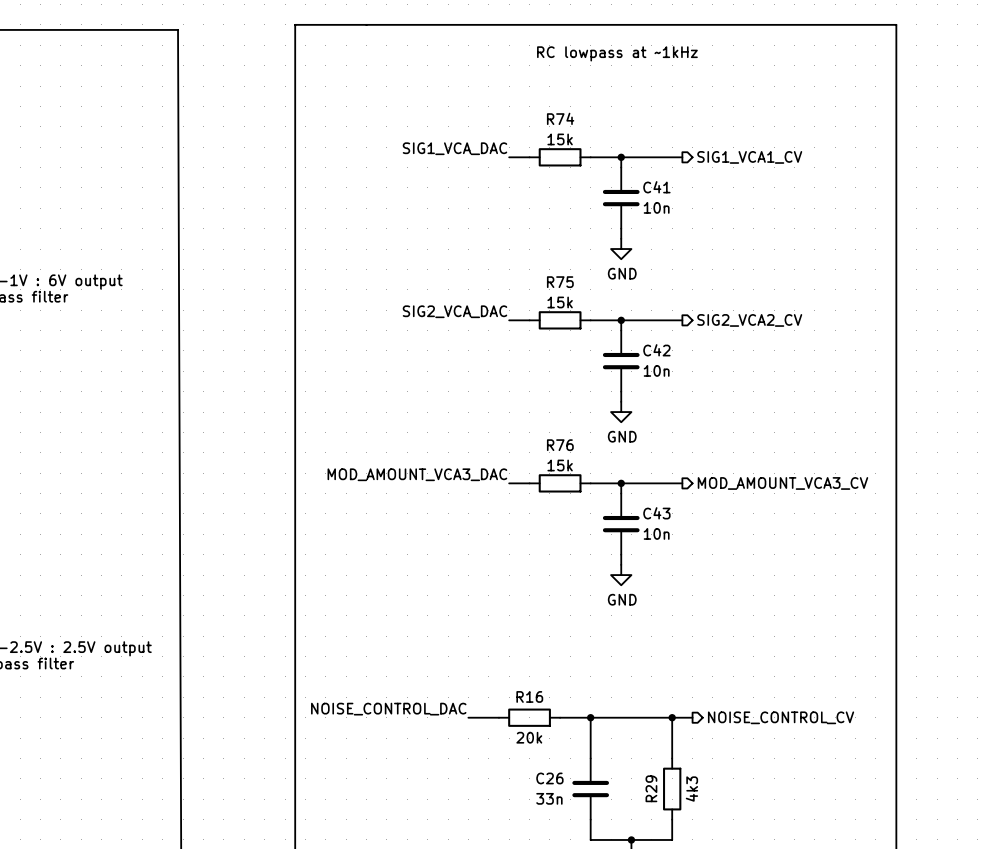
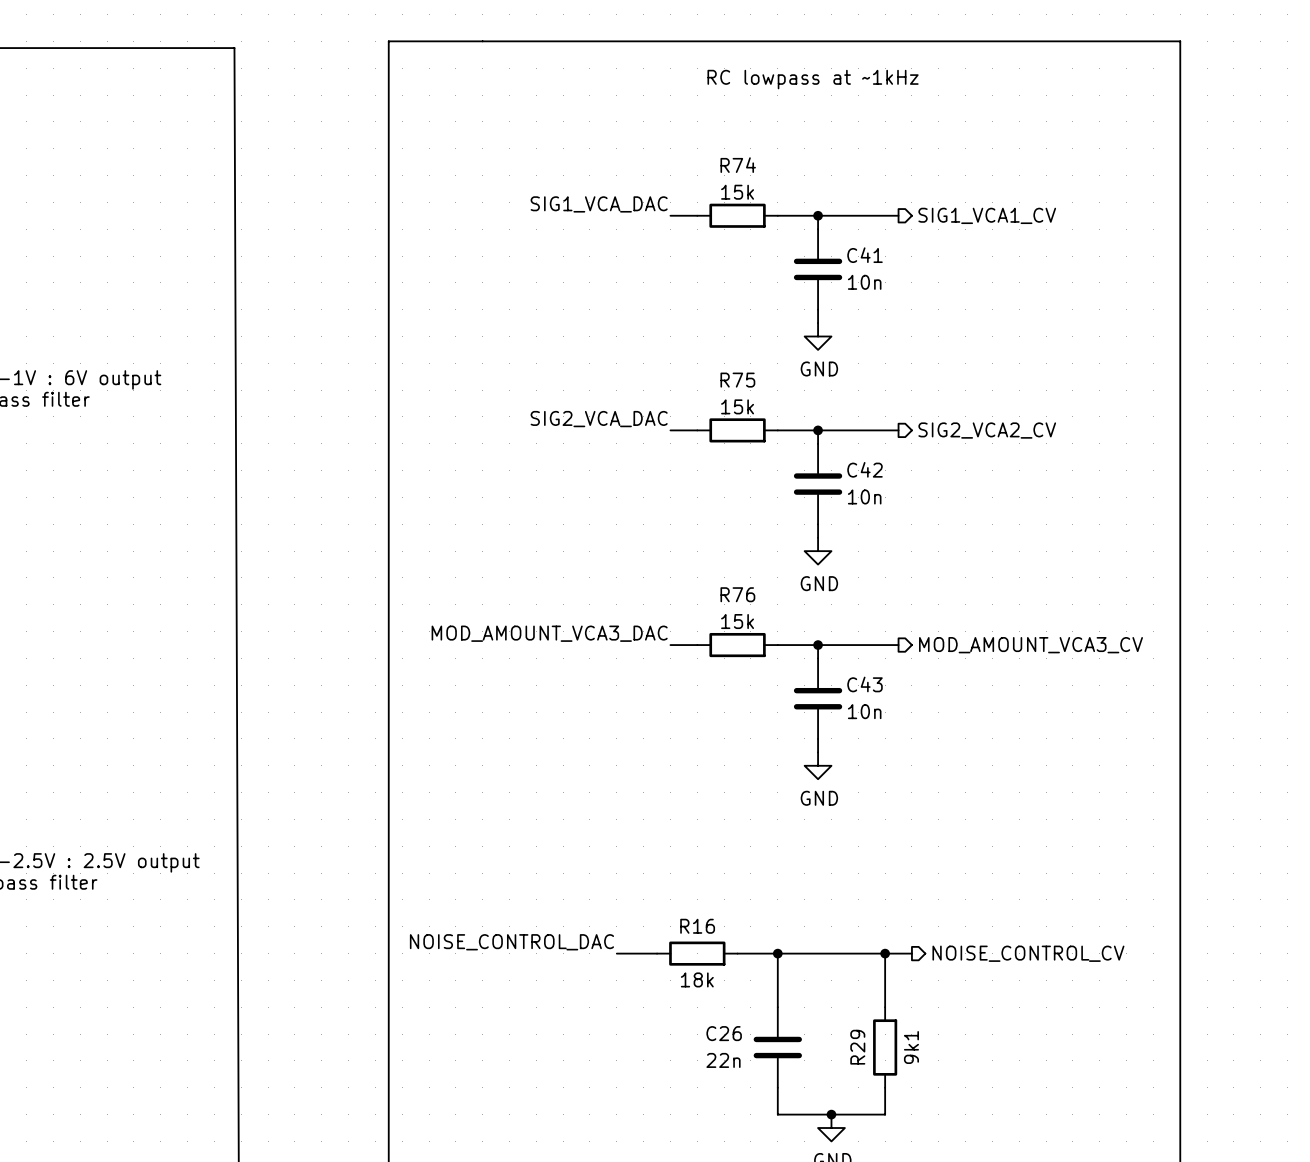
R16 value: 20k (529, 737) -> 18k (697, 979)
R29 value: 4k3 (691, 789) -> 9k1 (911, 1047)
C26 value: 33n (549, 798) -> 22n (723, 1060)

